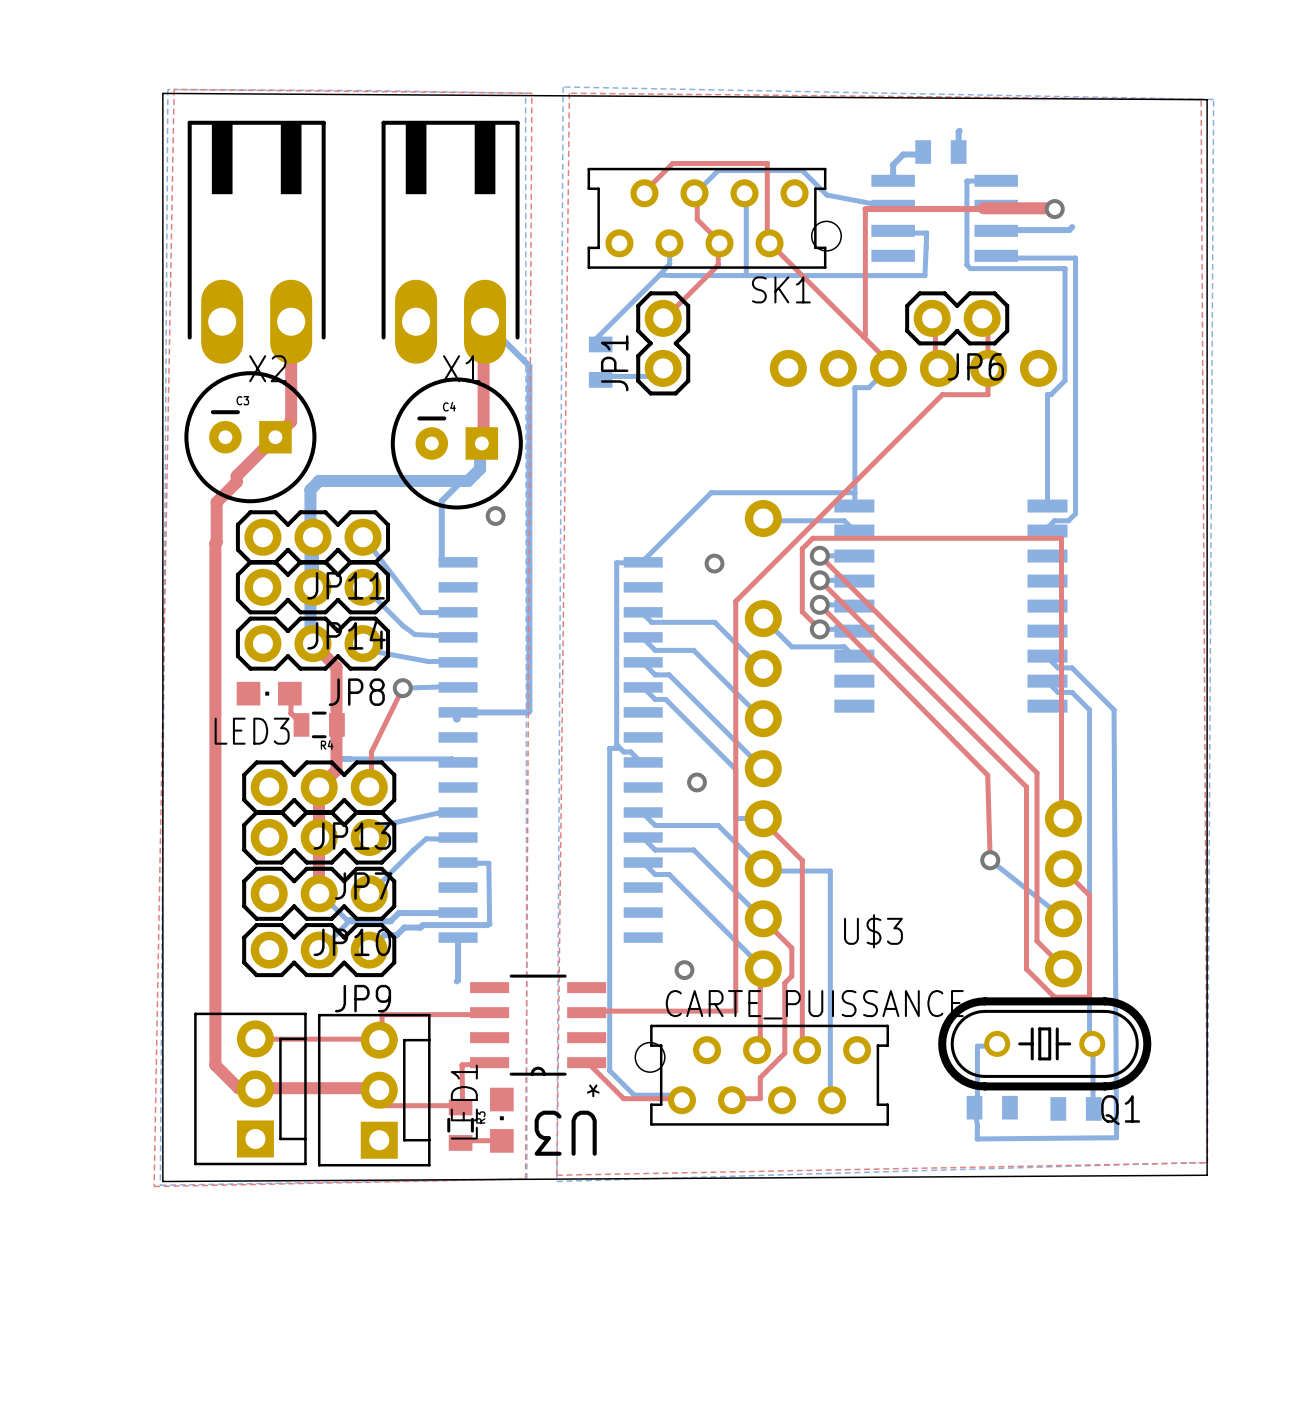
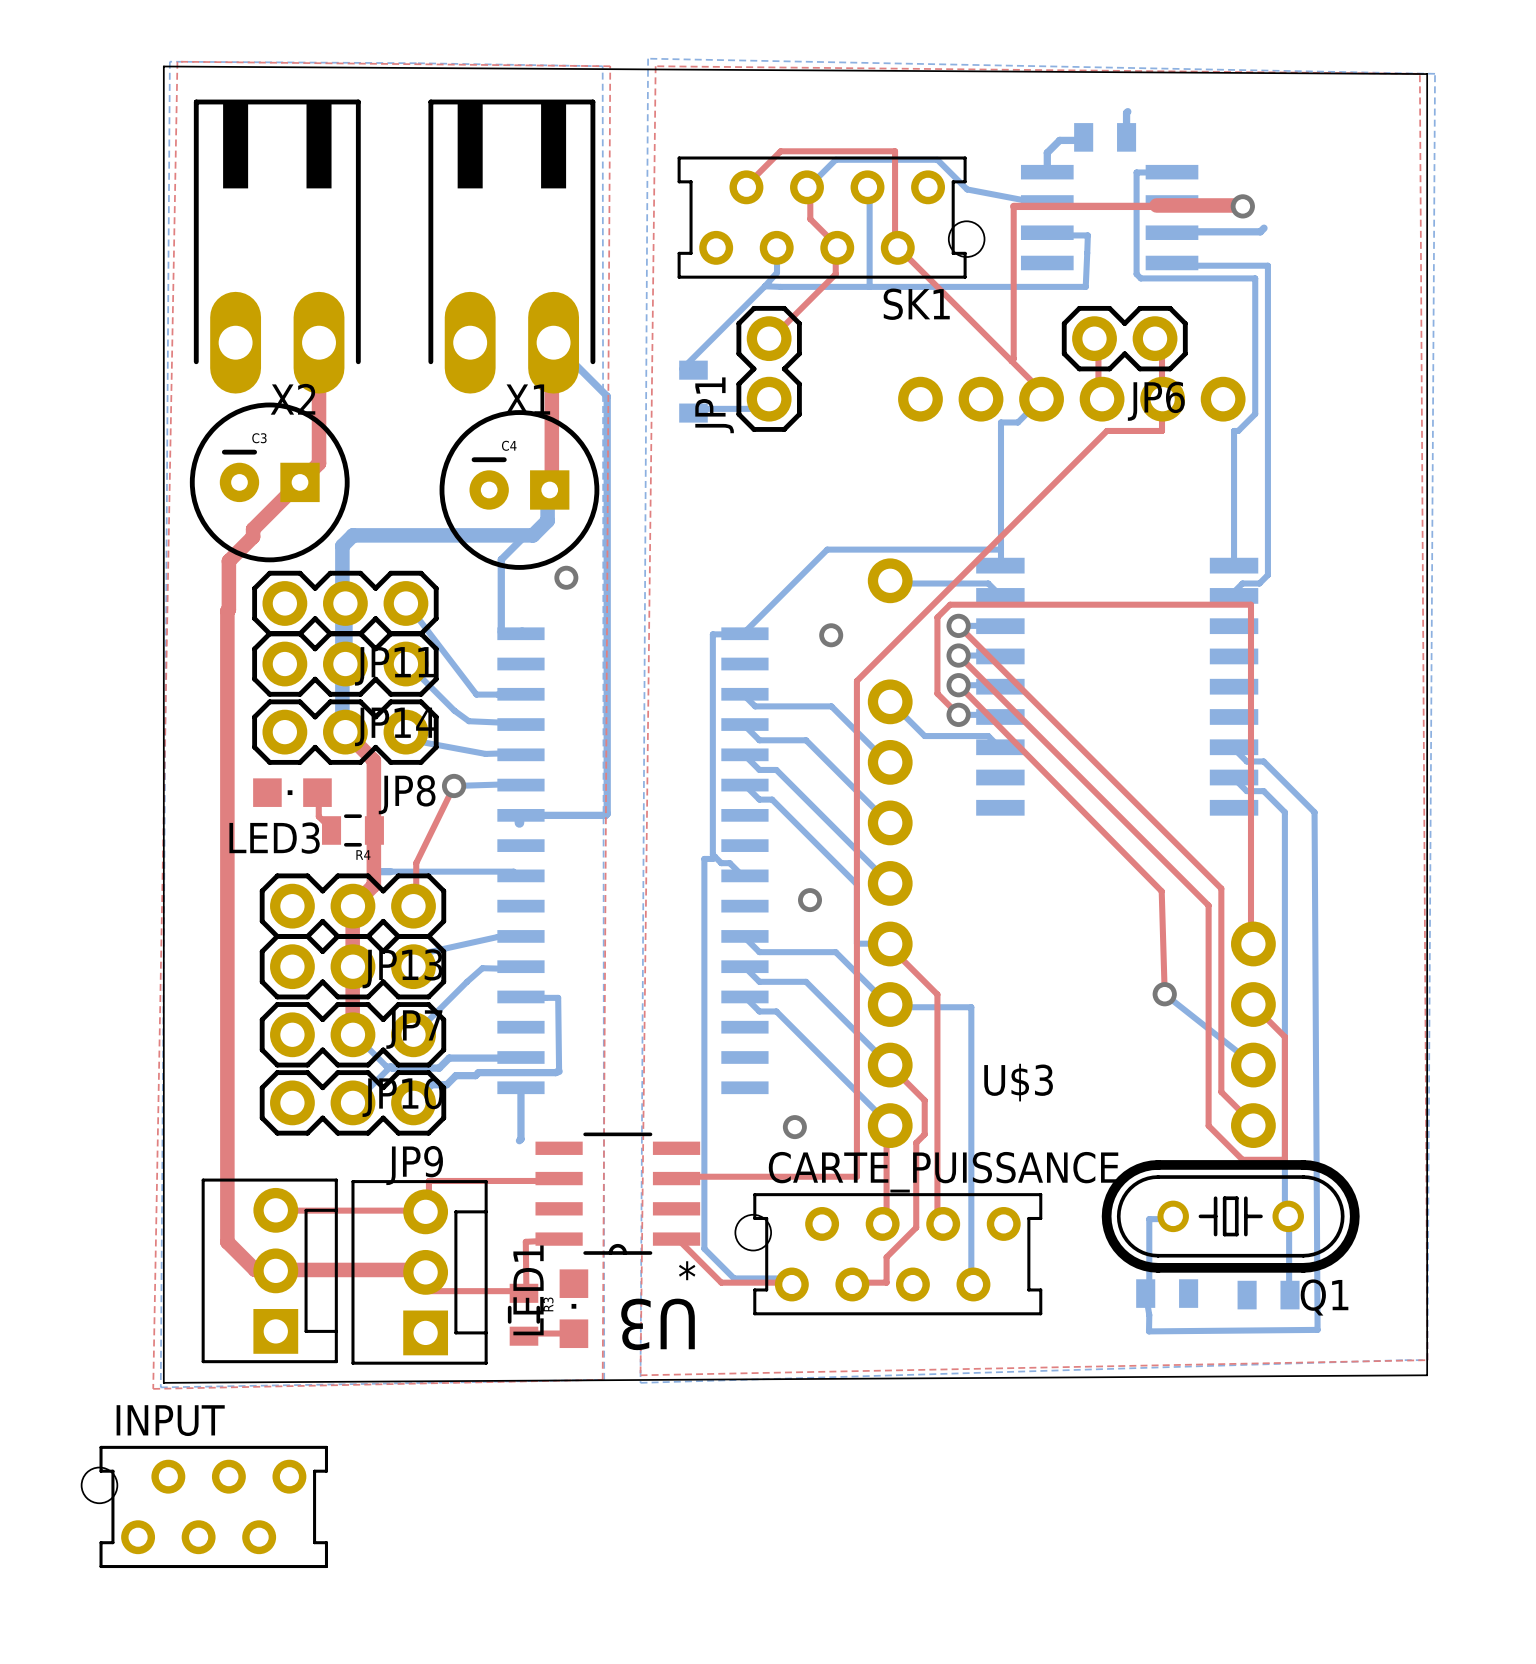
INPUT: none -> (204, 1506)

